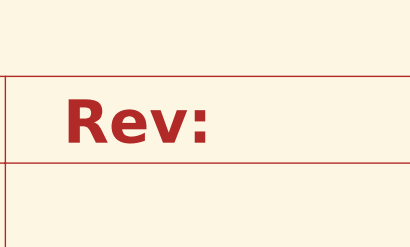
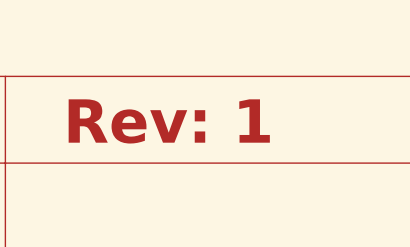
title block: Rev: (136, 121) -> Rev: 1 (169, 121)

